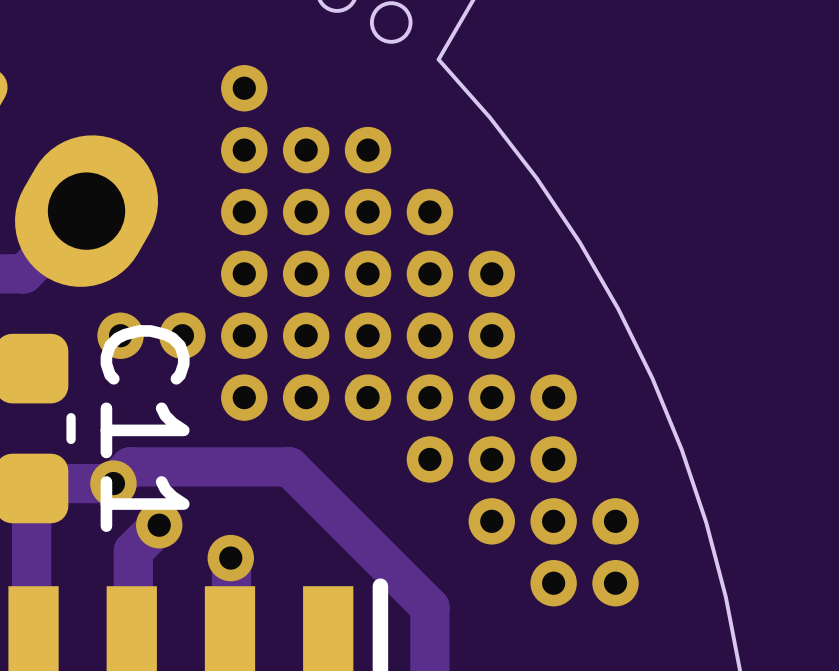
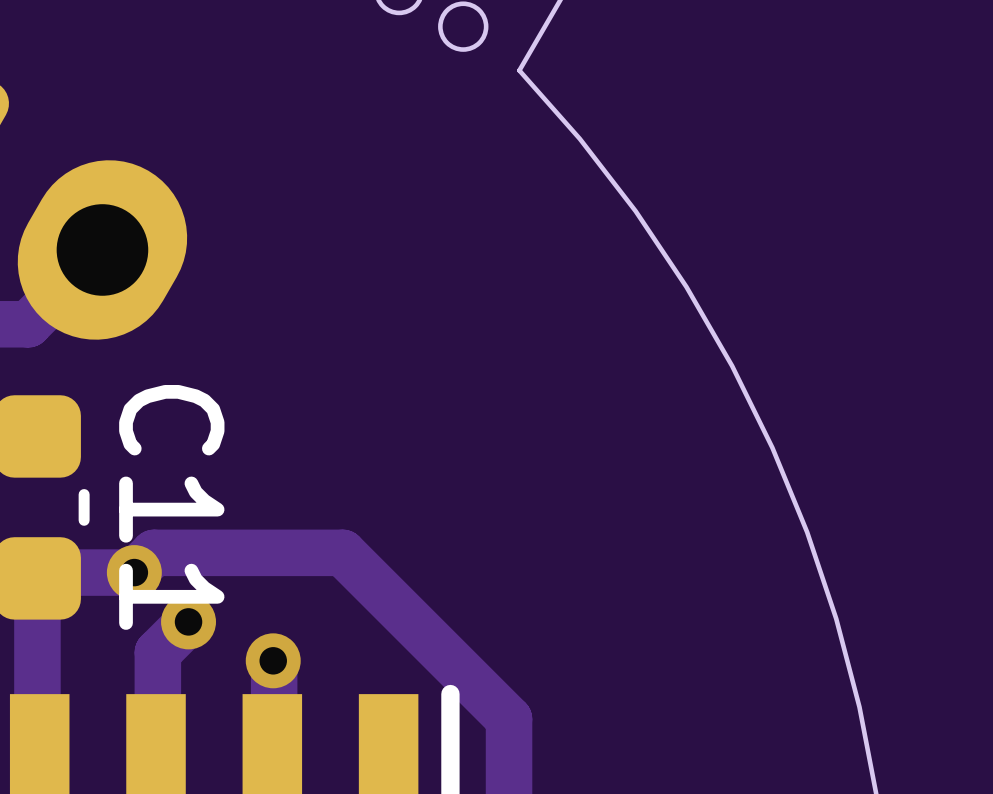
via: (244, 88) -> none
via: (244, 150) -> none
via: (306, 150) -> none
via: (368, 150) -> none
via: (244, 211) -> none
via: (306, 211) -> none
via: (368, 211) -> none
via: (429, 211) -> none
via: (244, 273) -> none
via: (306, 273) -> none
via: (368, 273) -> none
via: (429, 273) -> none
via: (491, 273) -> none
via: (120, 335) -> none
via: (182, 335) -> none
via: (244, 335) -> none
via: (306, 335) -> none
via: (368, 335) -> none
via: (429, 335) -> none
via: (491, 335) -> none
via: (244, 397) -> none
via: (306, 397) -> none
via: (368, 397) -> none
via: (429, 397) -> none
via: (491, 397) -> none
via: (553, 397) -> none
via: (429, 459) -> none
via: (491, 459) -> none
via: (553, 459) -> none
via: (491, 521) -> none
via: (553, 521) -> none
via: (615, 521) -> none
via: (553, 583) -> none
via: (615, 583) -> none

